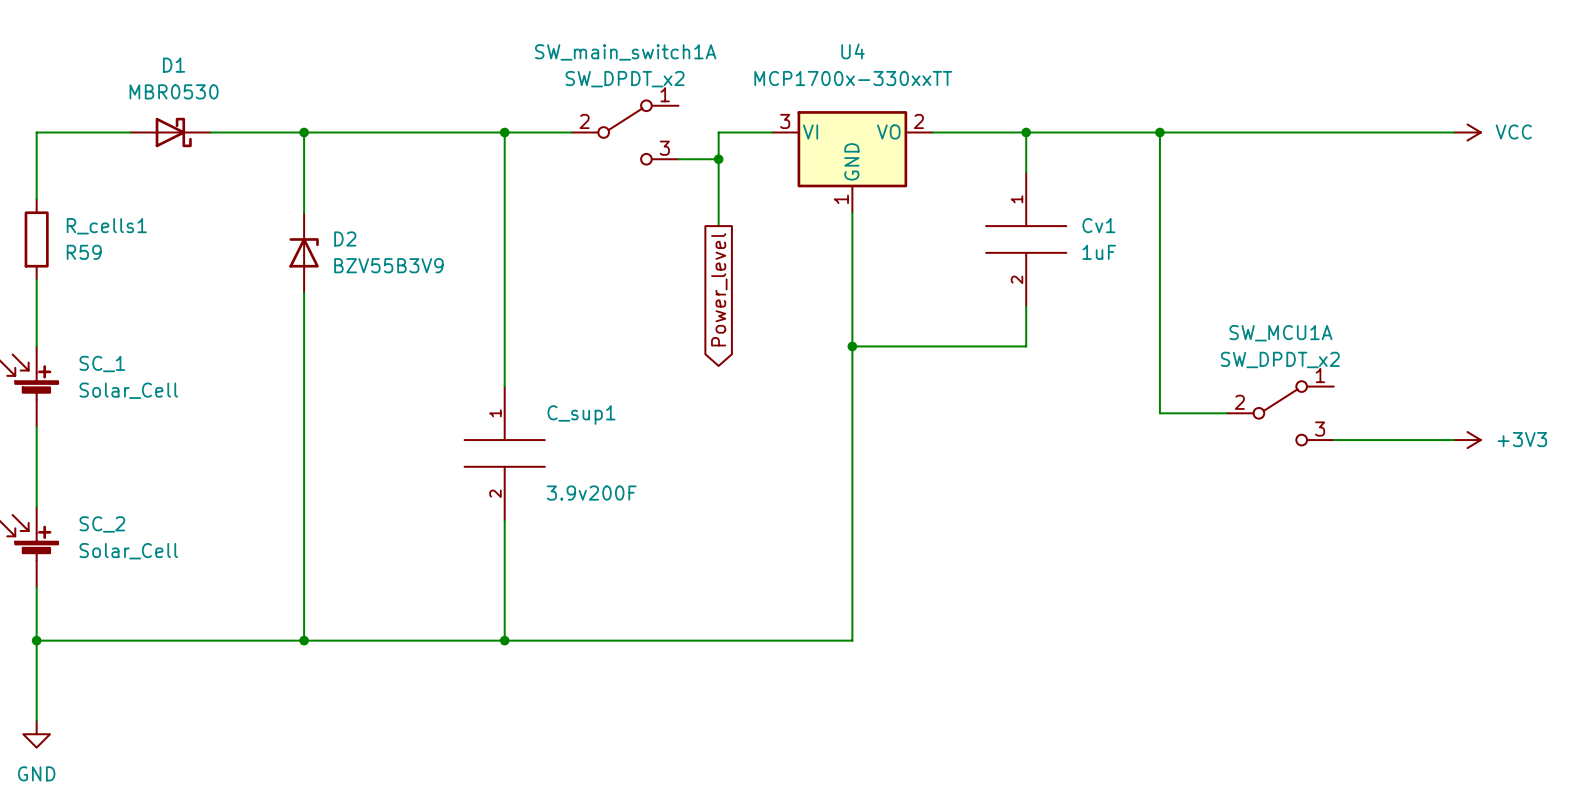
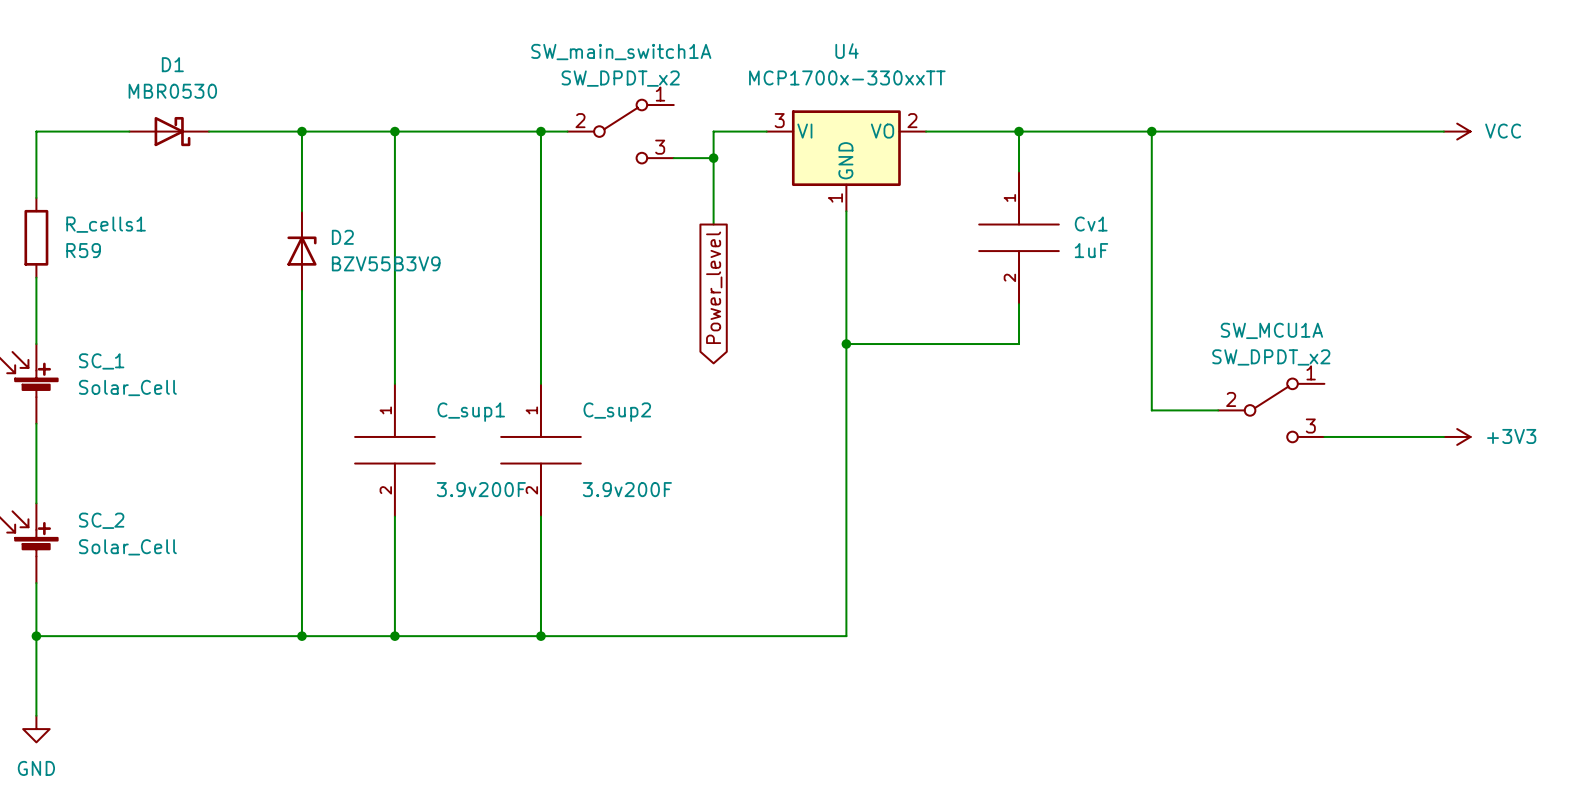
wire: none -> (394, 131) (394, 383)
junction: none -> (394, 131)
wire: (504, 132) (504, 386) -> (540, 131) (540, 383)
junction position: (504, 132) -> (540, 131)
C_sup1 position: (504, 453) -> (394, 450)
C_sup2: none -> 3.9v200F (540, 450)
wire: none -> (394, 516) (394, 636)
wire: (504, 520) (504, 640) -> (540, 516) (540, 636)
junction: none -> (394, 636)
junction position: (504, 640) -> (540, 636)

